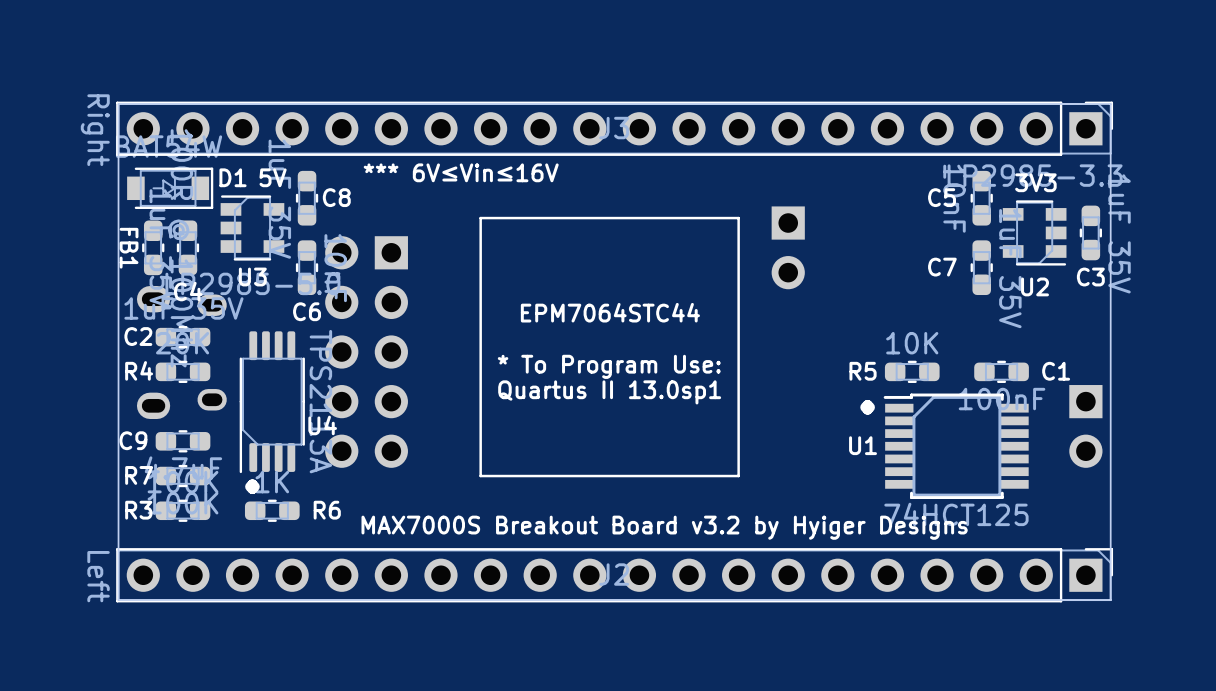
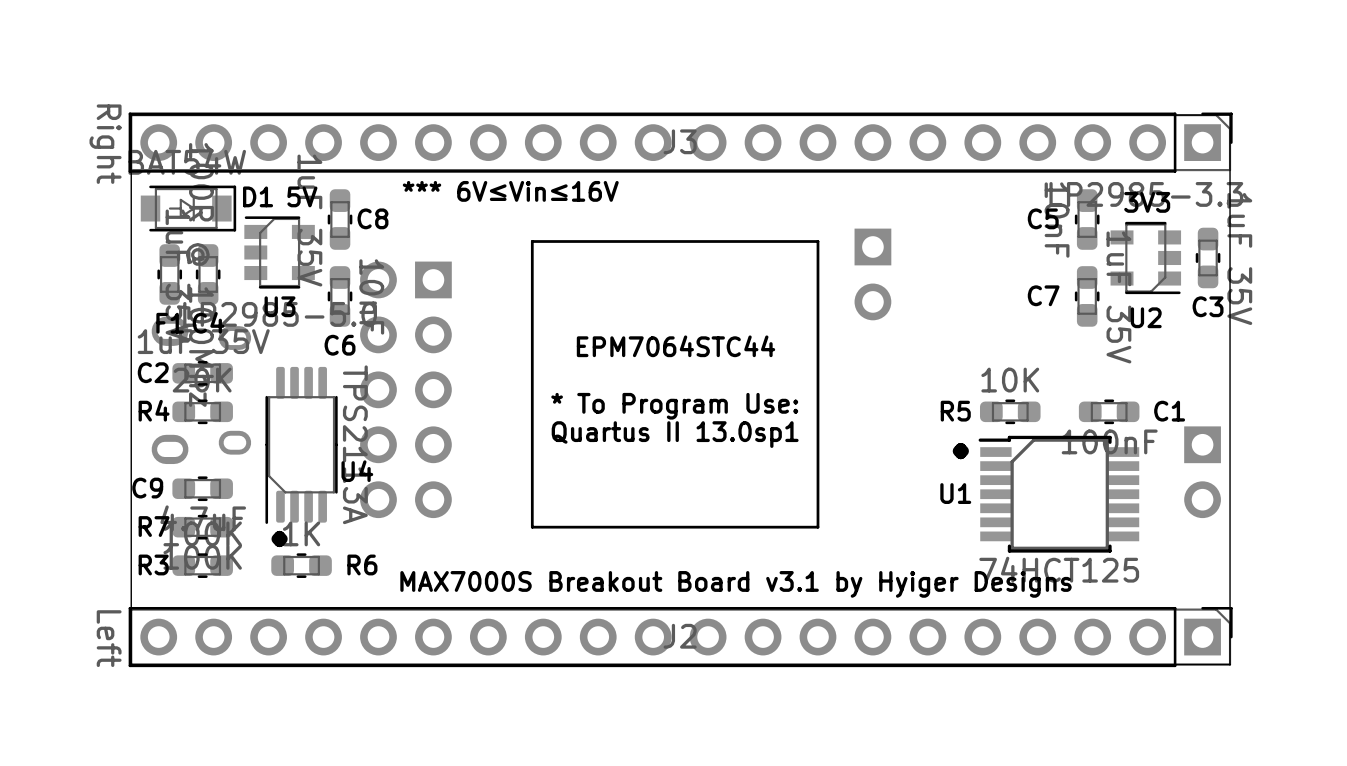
FB1 name: FB1 (129, 248) -> F1 (170, 323)
text: MAX7000S Breakout Board v3.2 by Hyiger Designs (664, 527) -> MAX7000S Breakout Board v3.1 by Hyiger Designs (736, 584)

